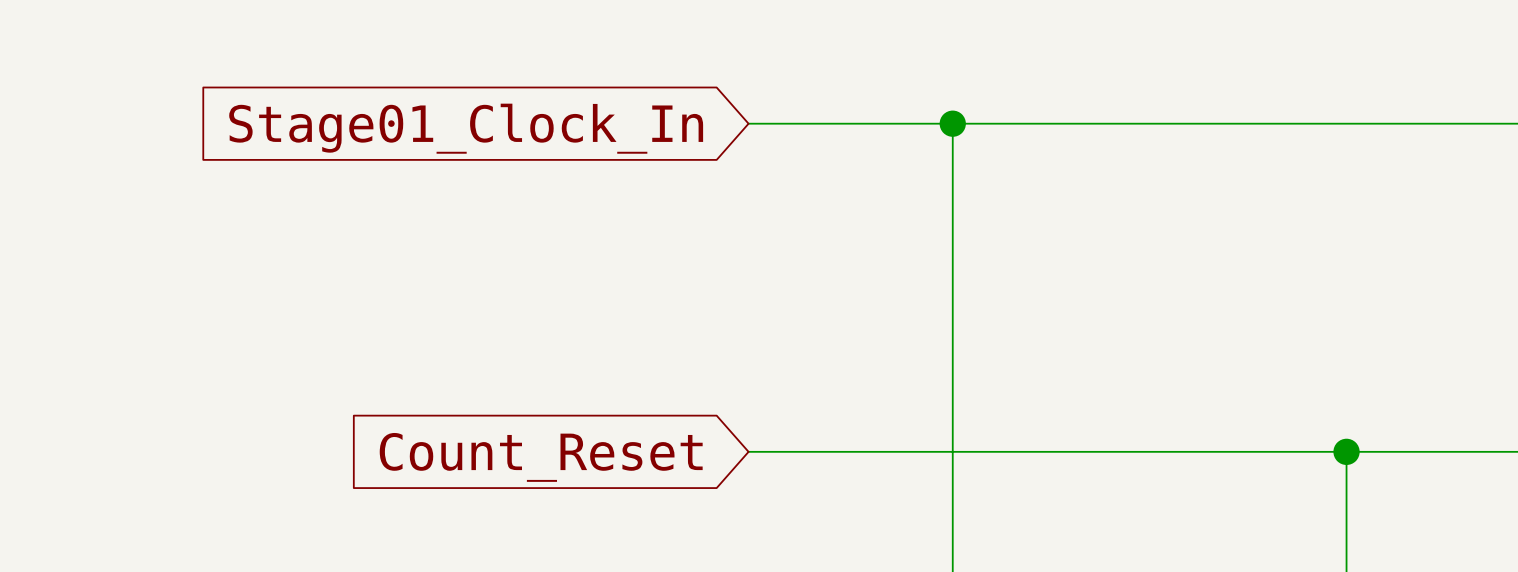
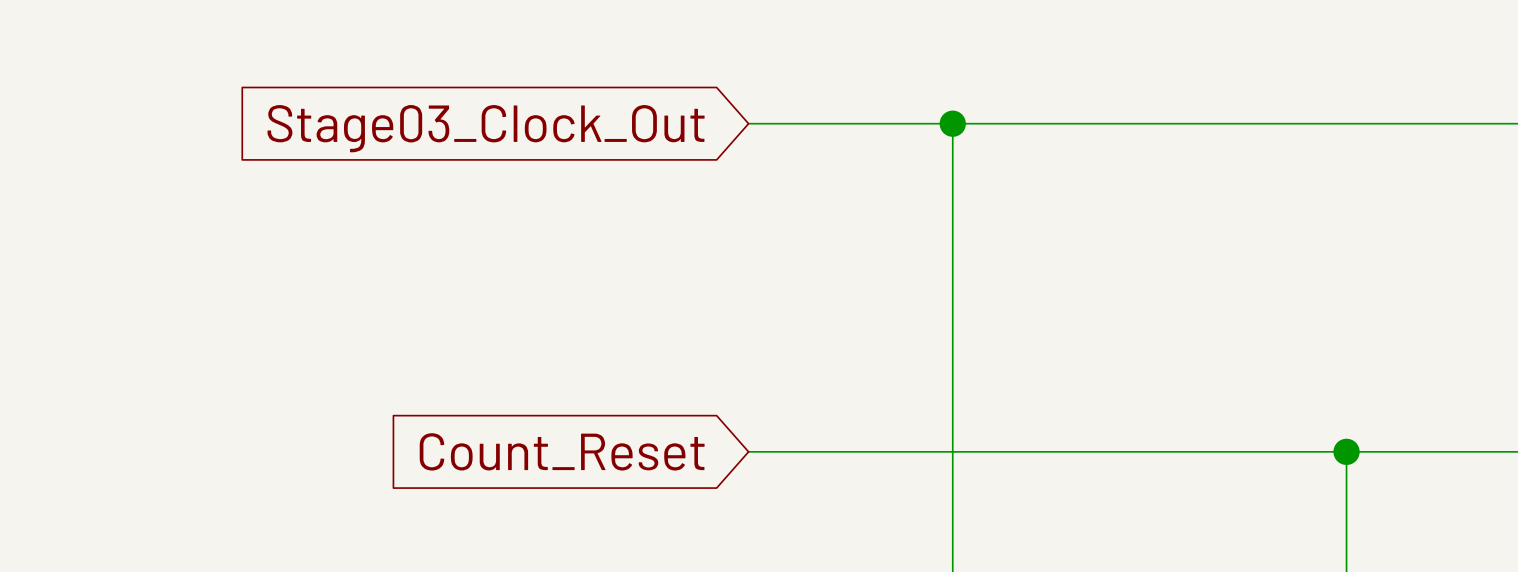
global label: Stage01_Clock_In (466, 128) -> Stage03_Clock_Out (486, 128)

